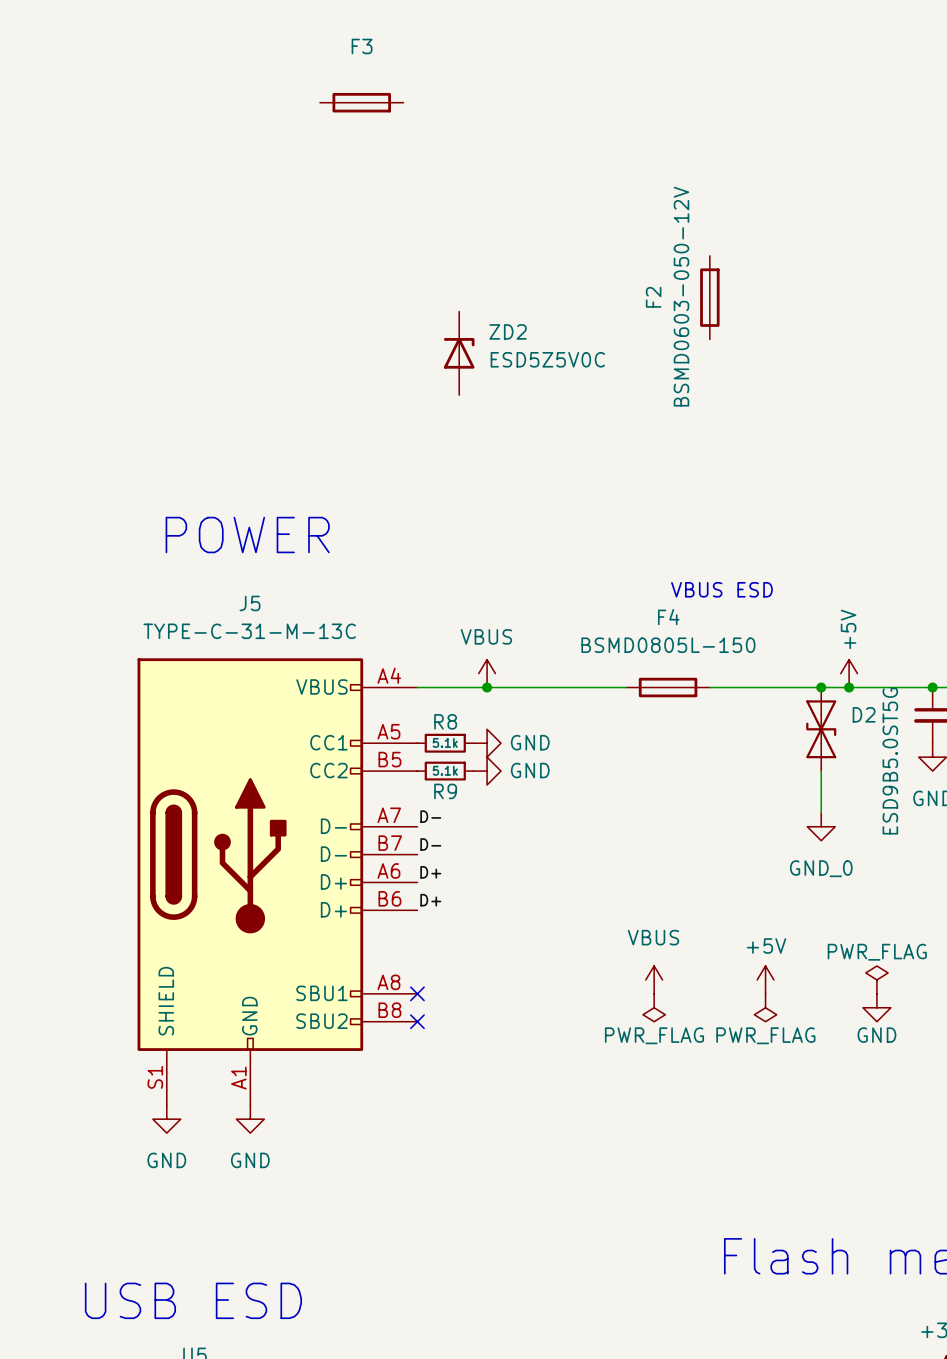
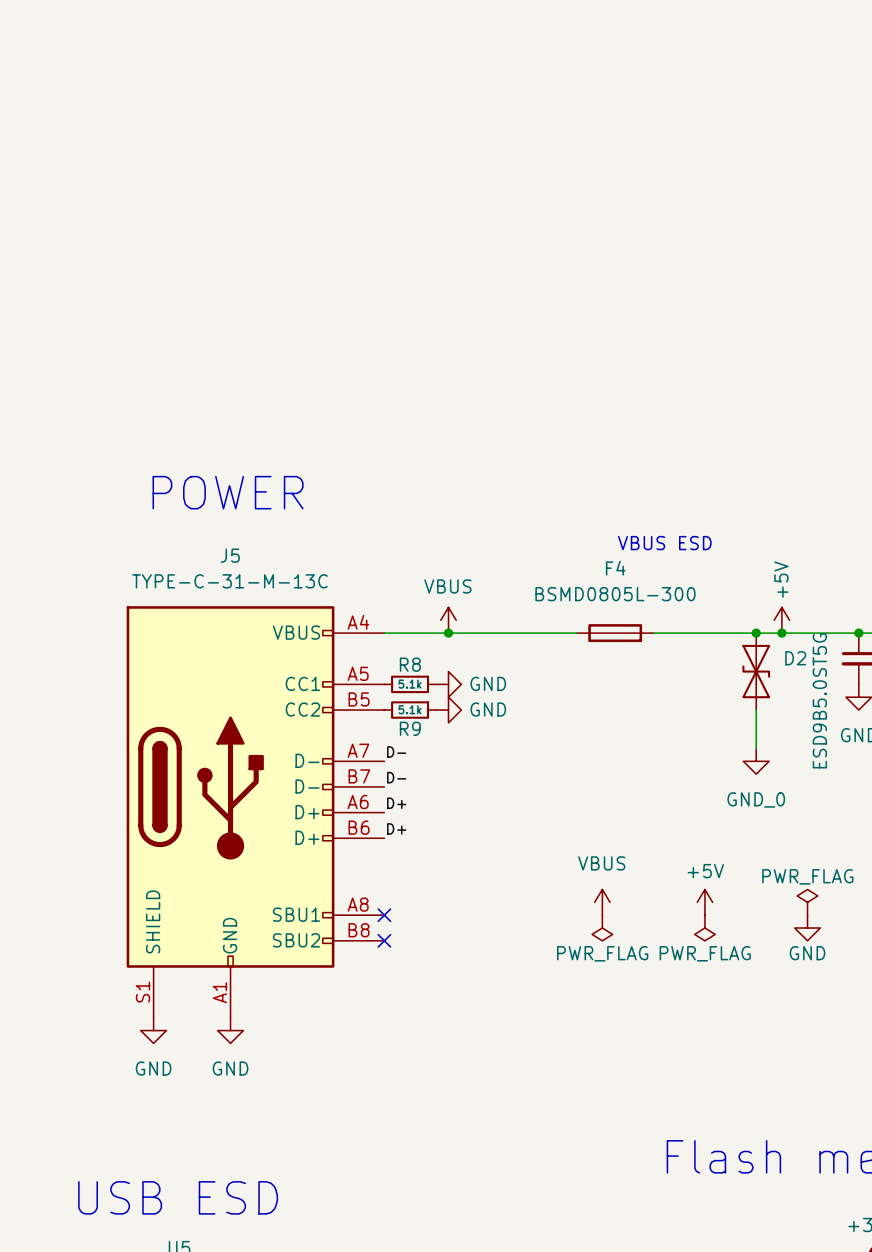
F3: (361, 102) -> none
F2: BSMD0603-050-12V (709, 297) -> none
ZD2: ESD5Z5V0C (459, 353) -> none
F4 value: BSMD0805L-150 (668, 645) -> BSMD0805L-300 (615, 594)

